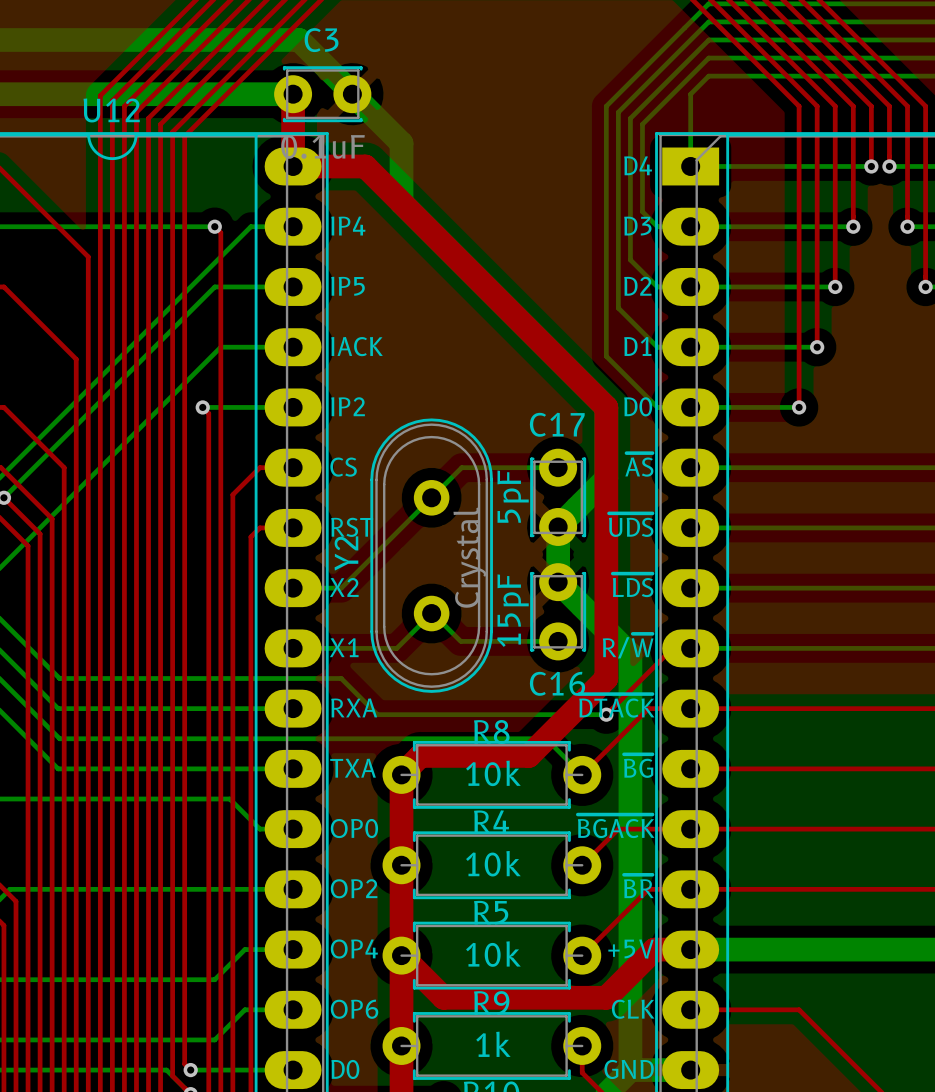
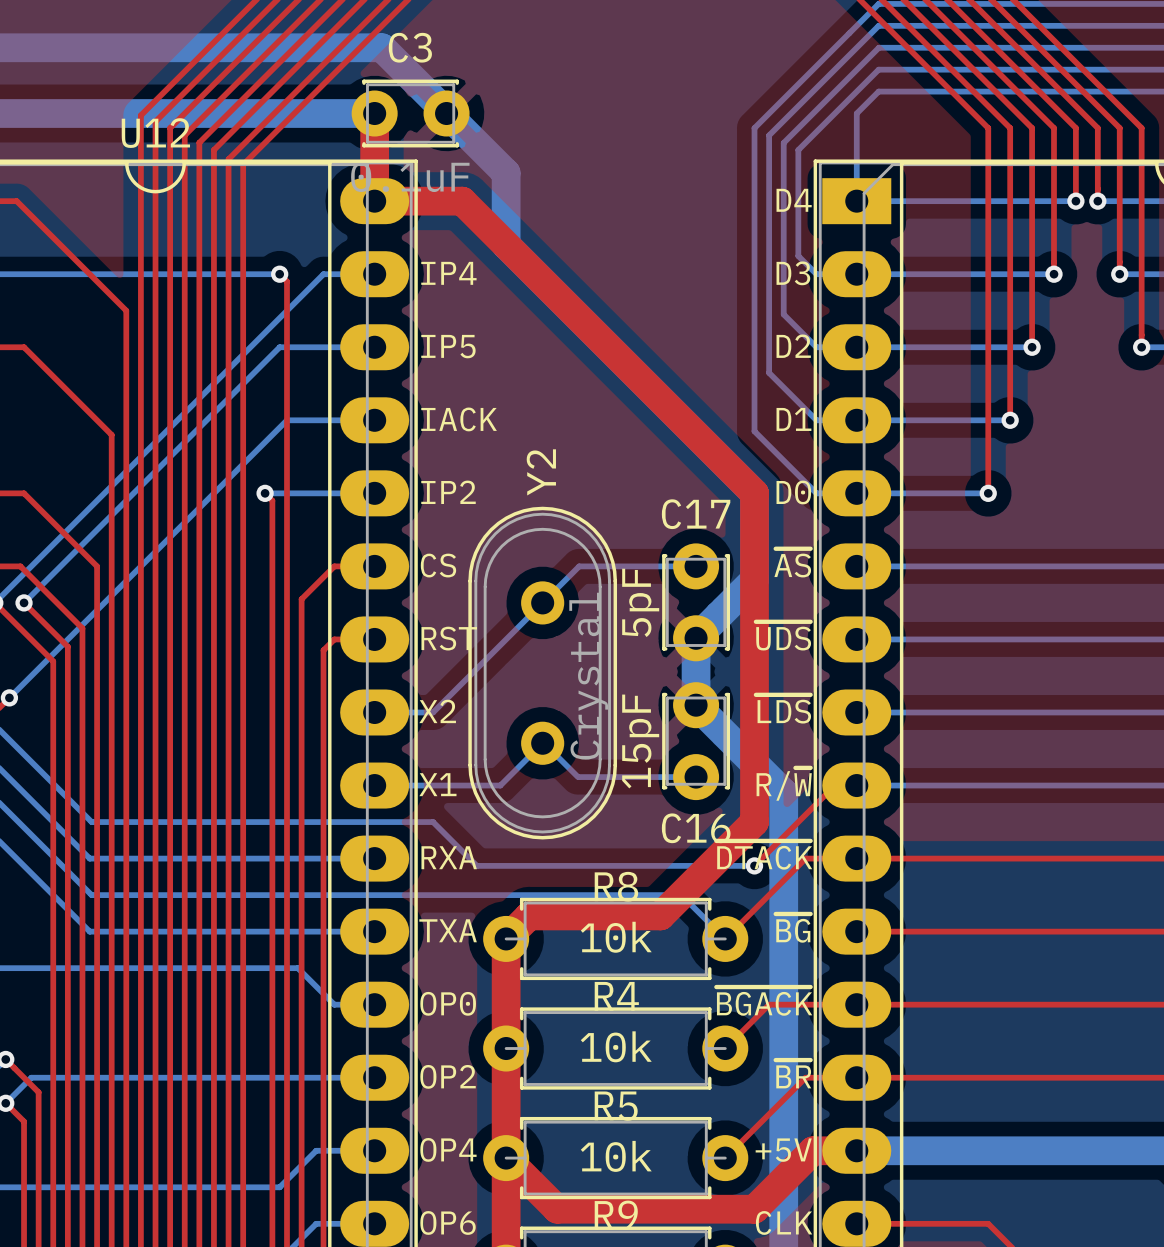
Y2 name position: Y2 (346, 553) -> Y2 (541, 472)

